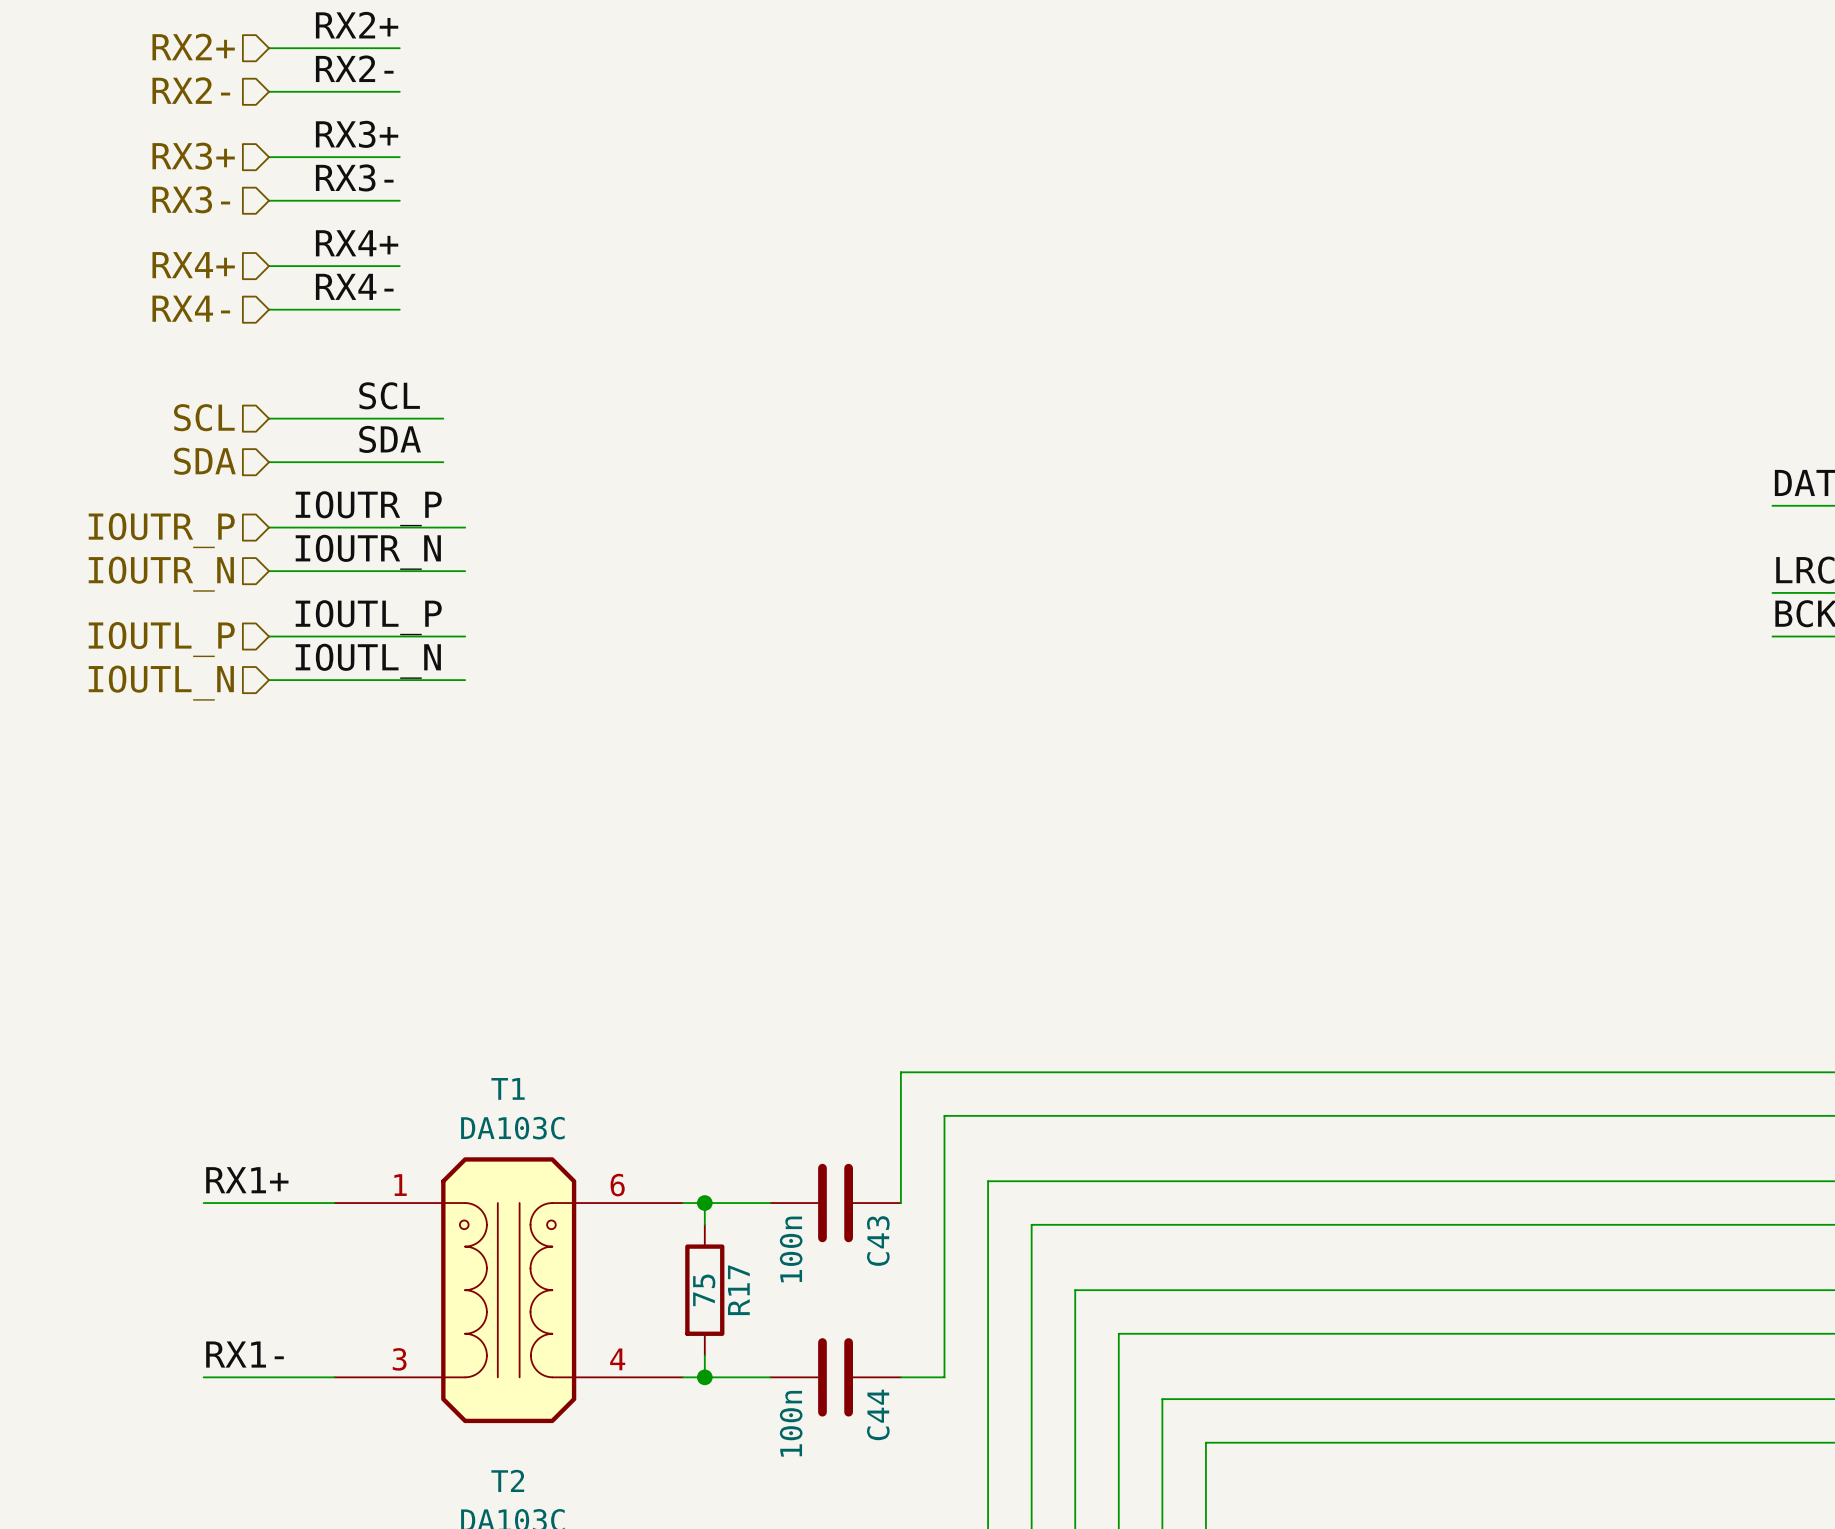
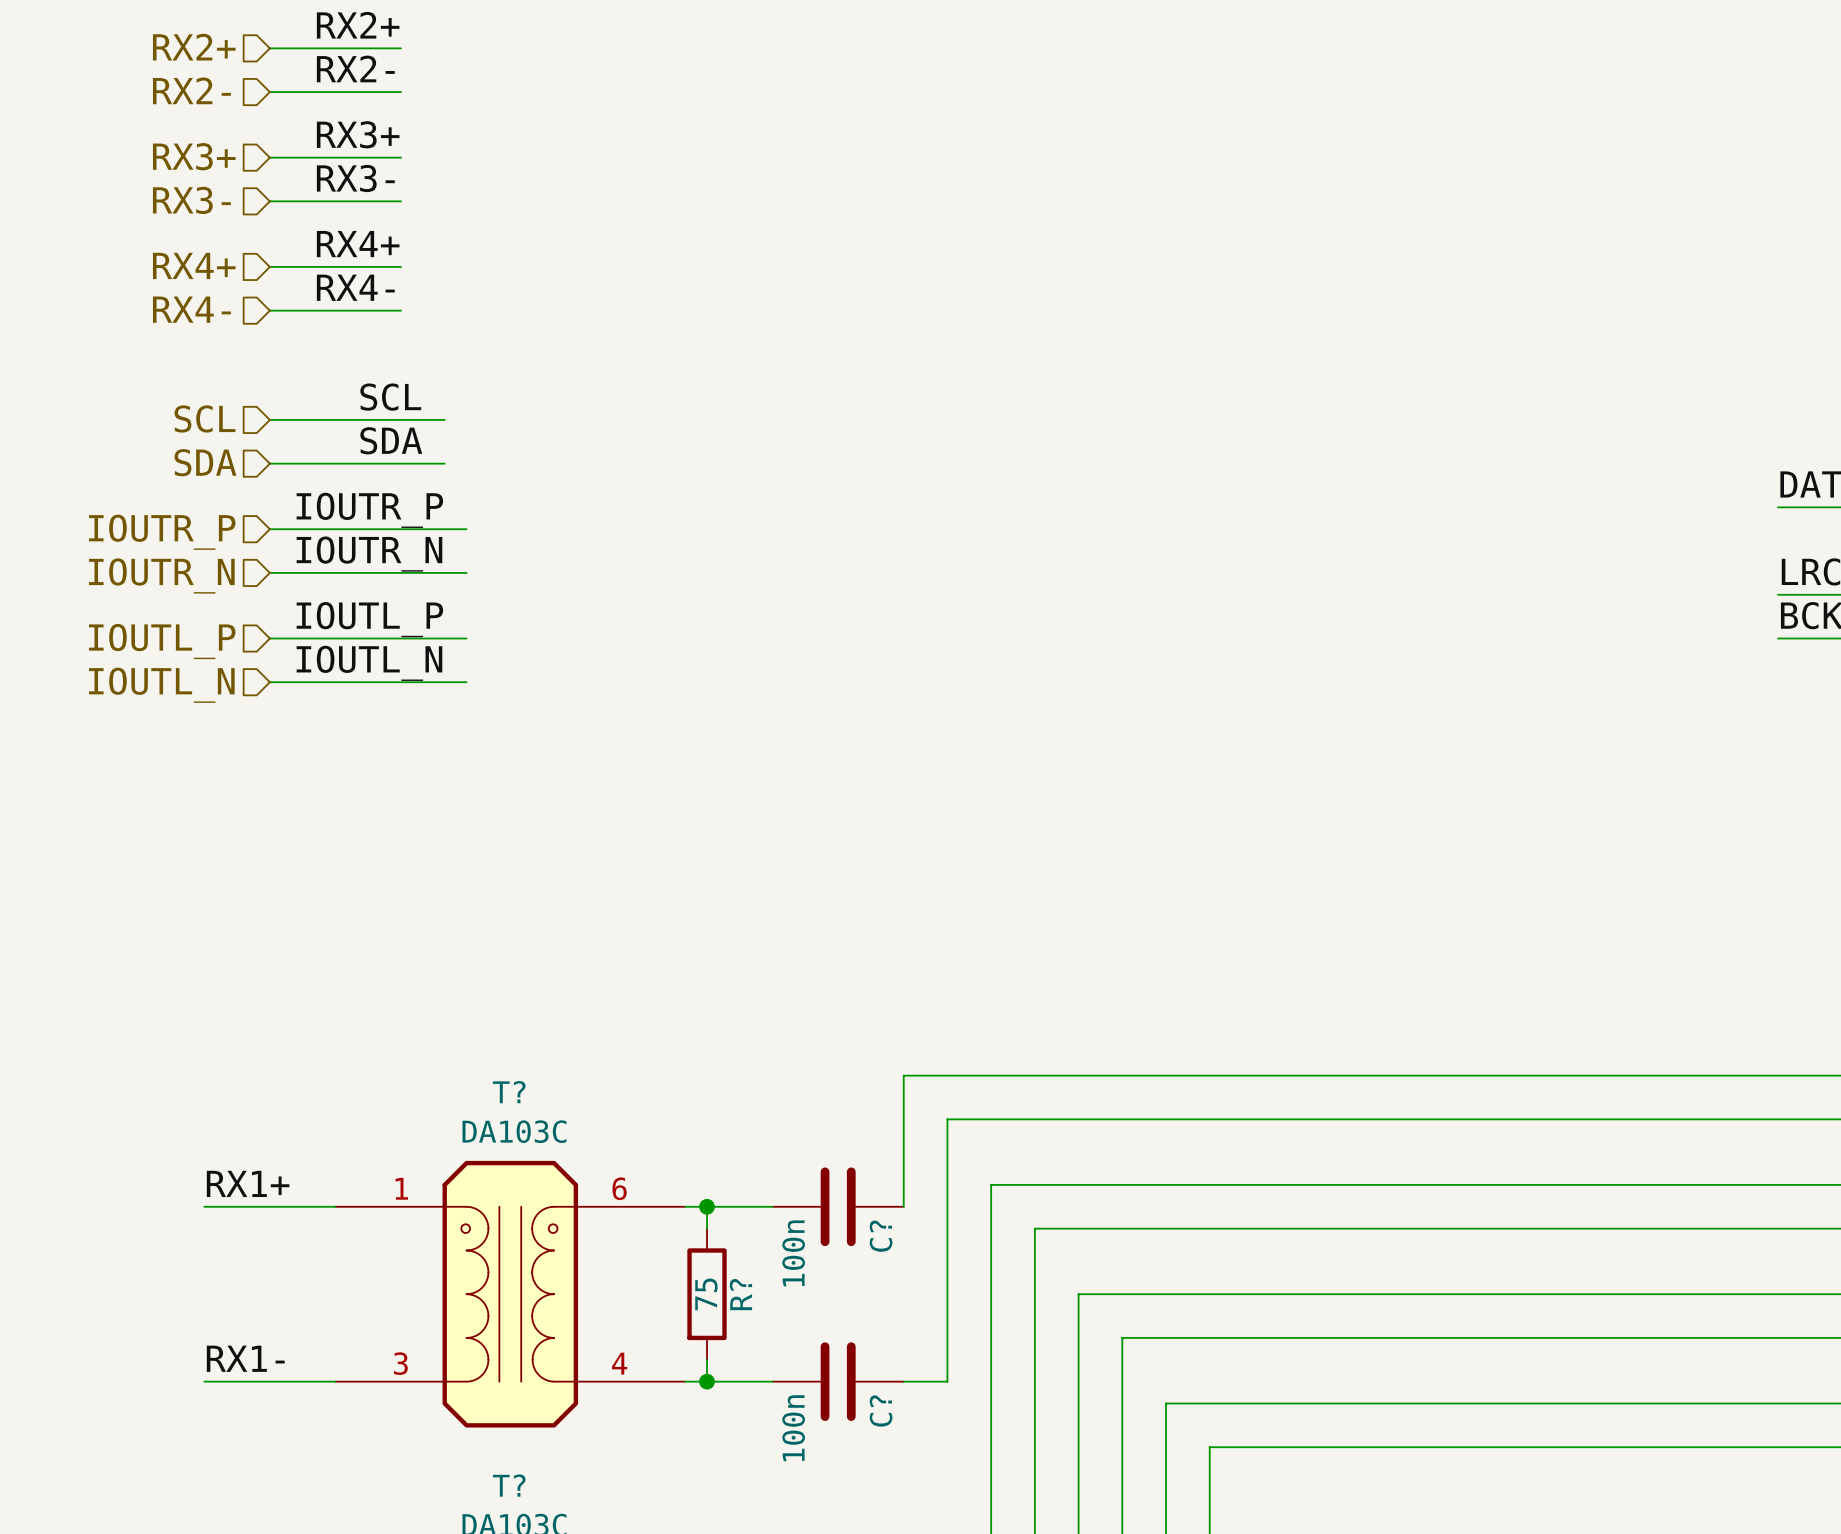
T1 name: T1 (508, 1088) -> T? (509, 1092)
C43 name: C43 (878, 1241) -> C? (881, 1236)
R17 name: R17 (738, 1290) -> R? (740, 1294)
C44 name: C44 (878, 1414) -> C? (881, 1411)
T2 name: T2 (507, 1480) -> T? (509, 1485)

